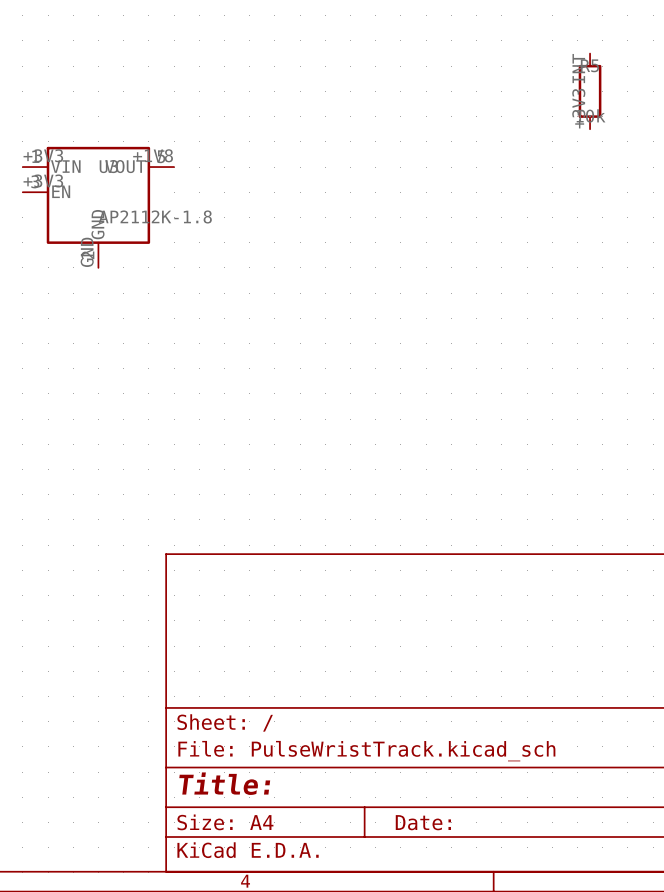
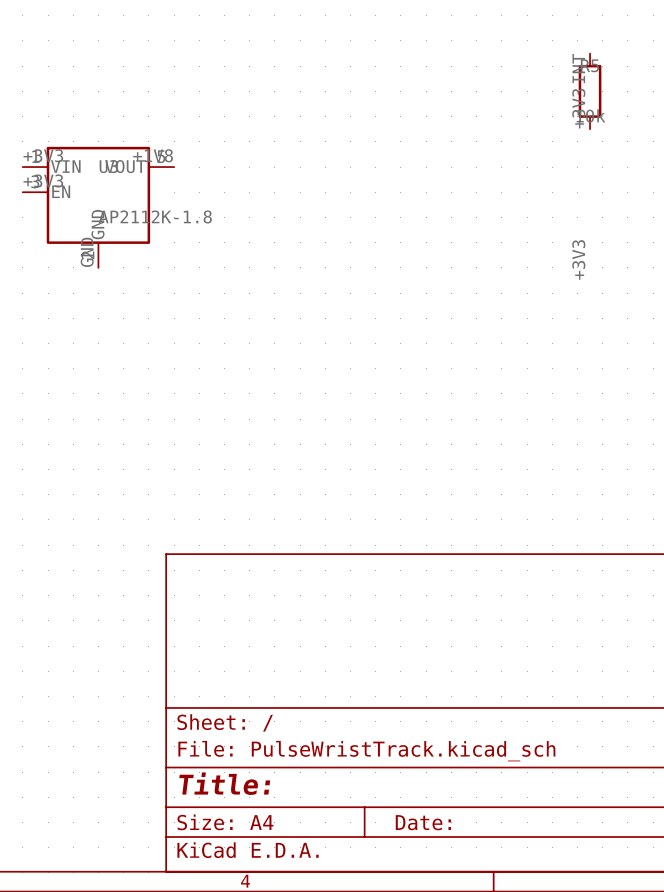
label: none -> +3V3 (578, 259)

